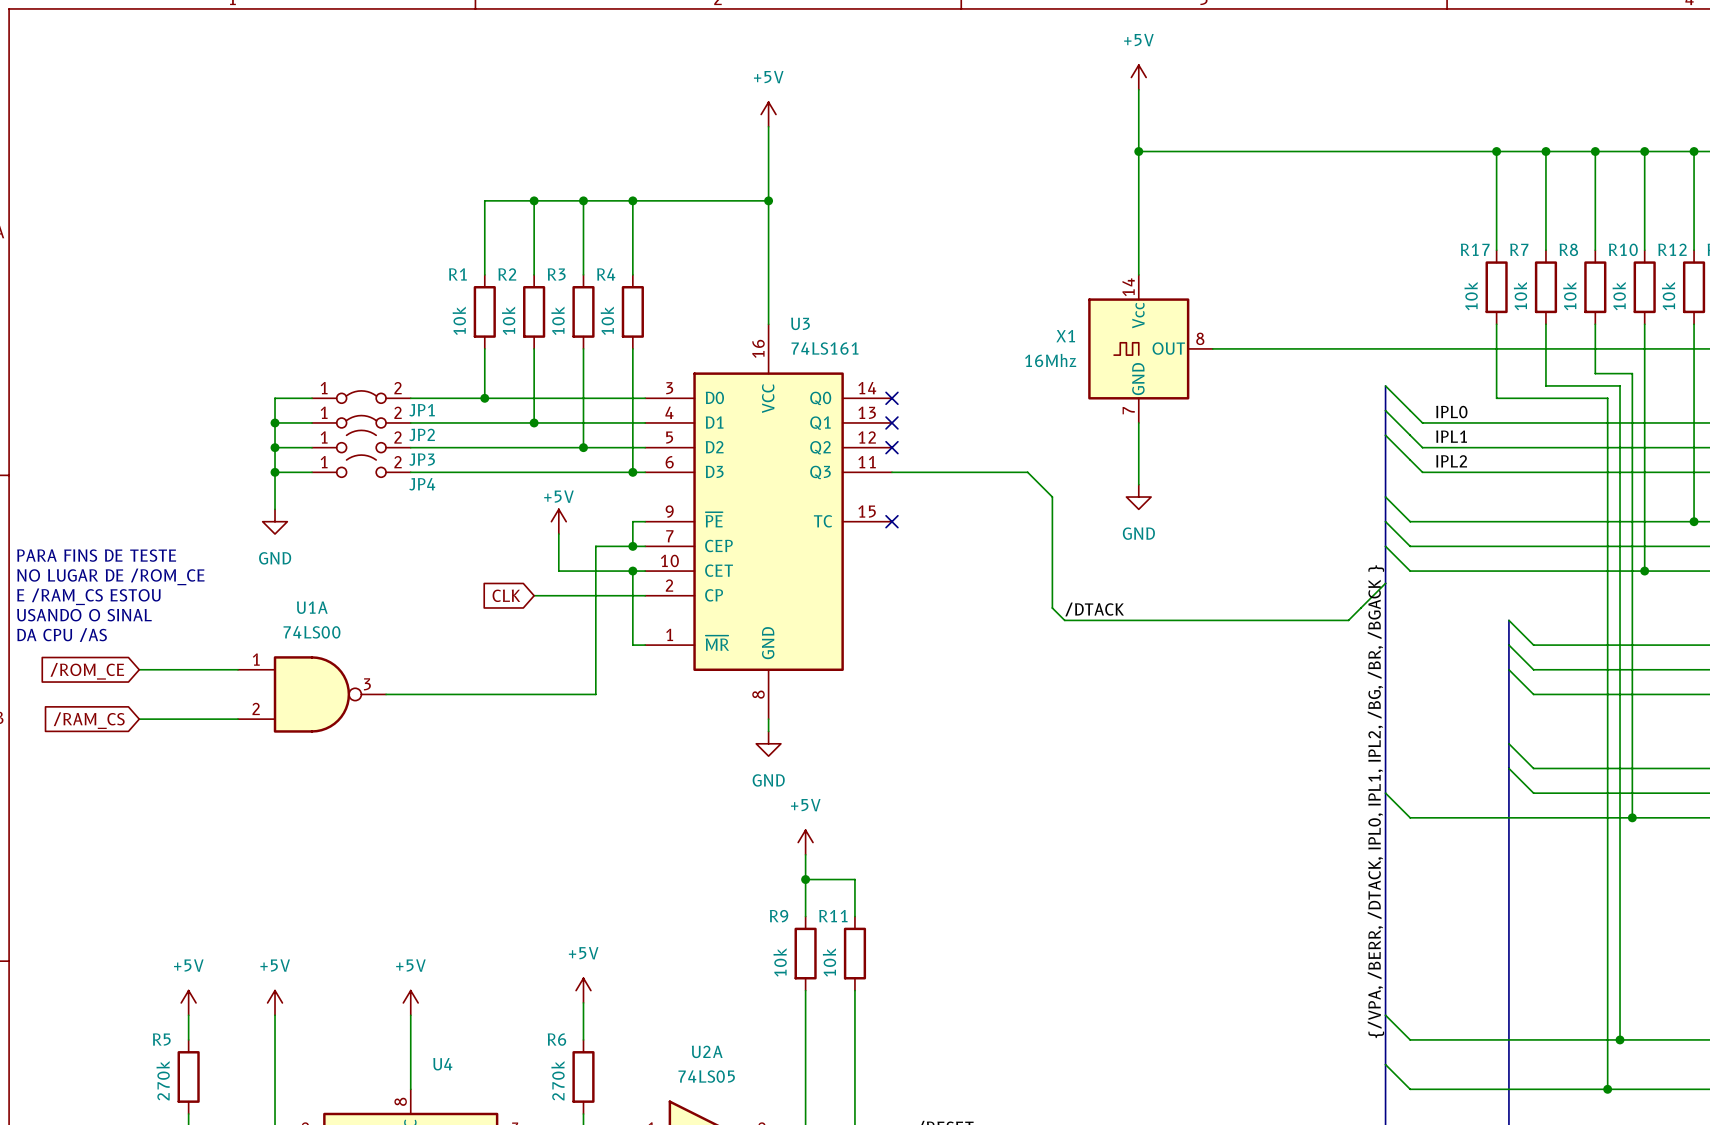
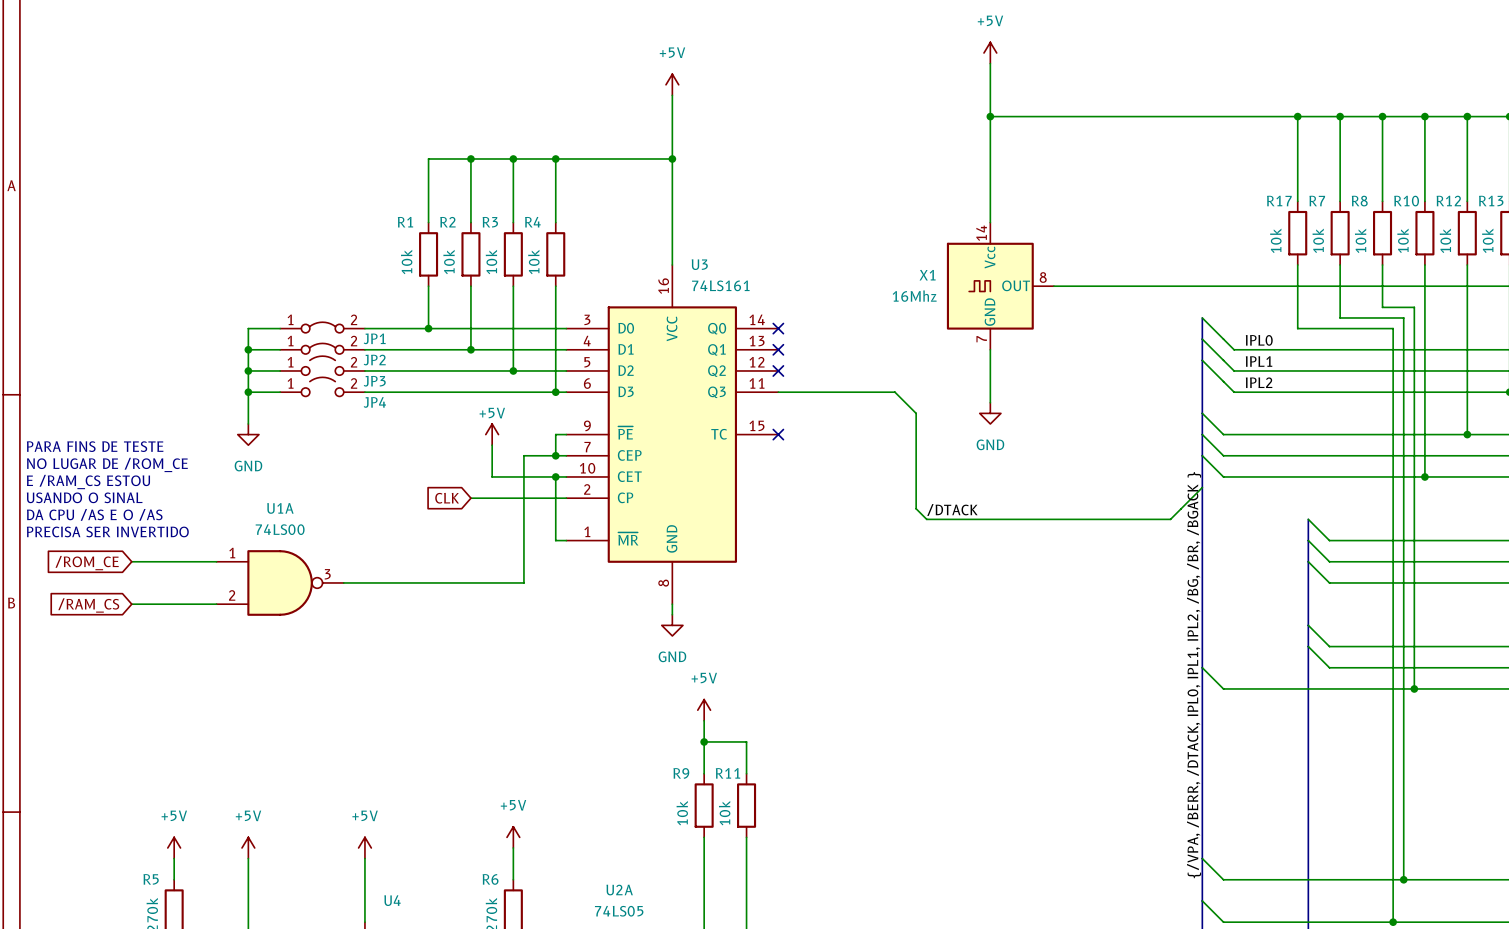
text: none -> PARA FINS DE TESTE (95, 446)
text: PARA FINS DE TESTE (96, 555) -> NO LUGAR DE /ROM_CE (107, 464)
text: NO LUGAR DE /ROM_CE (110, 576) -> E /RAM_CS ESTOU (88, 482)
text: E /RAM_CS ESTOU (88, 596) -> USANDO O SINAL (84, 497)
text: USANDO O SINAL (84, 615) -> DA CPU /AS E O /AS (94, 514)
text: DA CPU /AS (62, 635) -> PRECISA SER INVERTIDO (107, 531)

